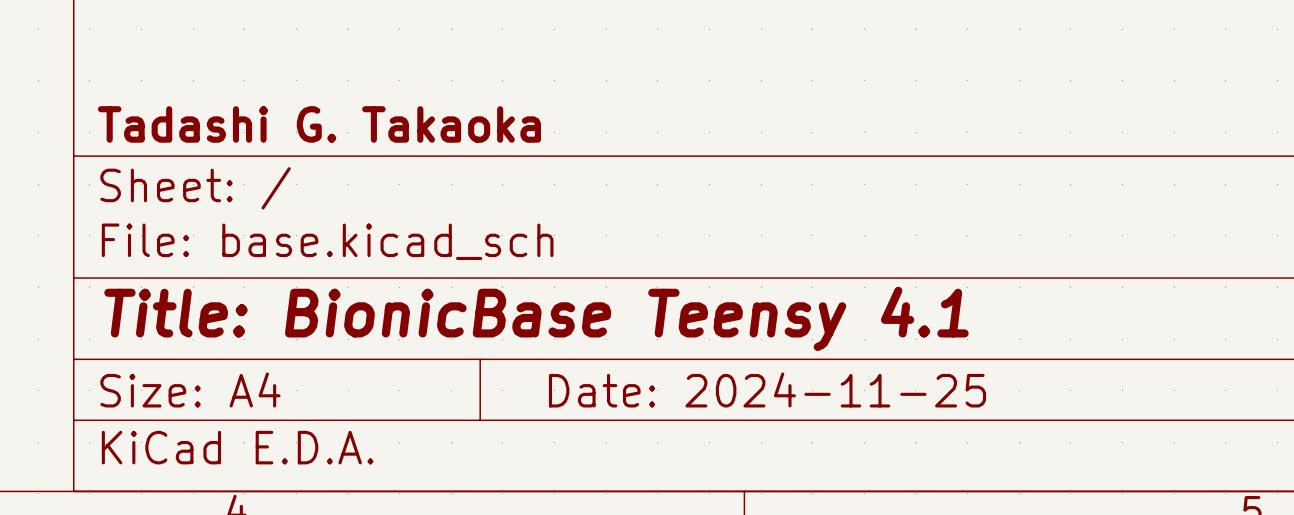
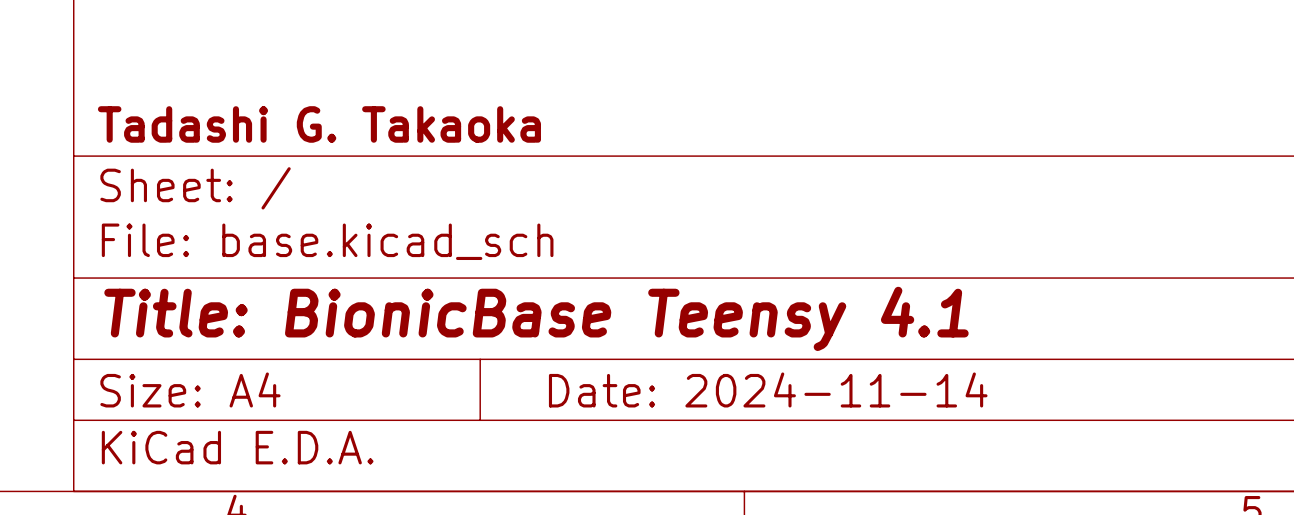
title block: Date: 2024-11-25 (767, 389) -> Date: 2024-11-14 (768, 389)

